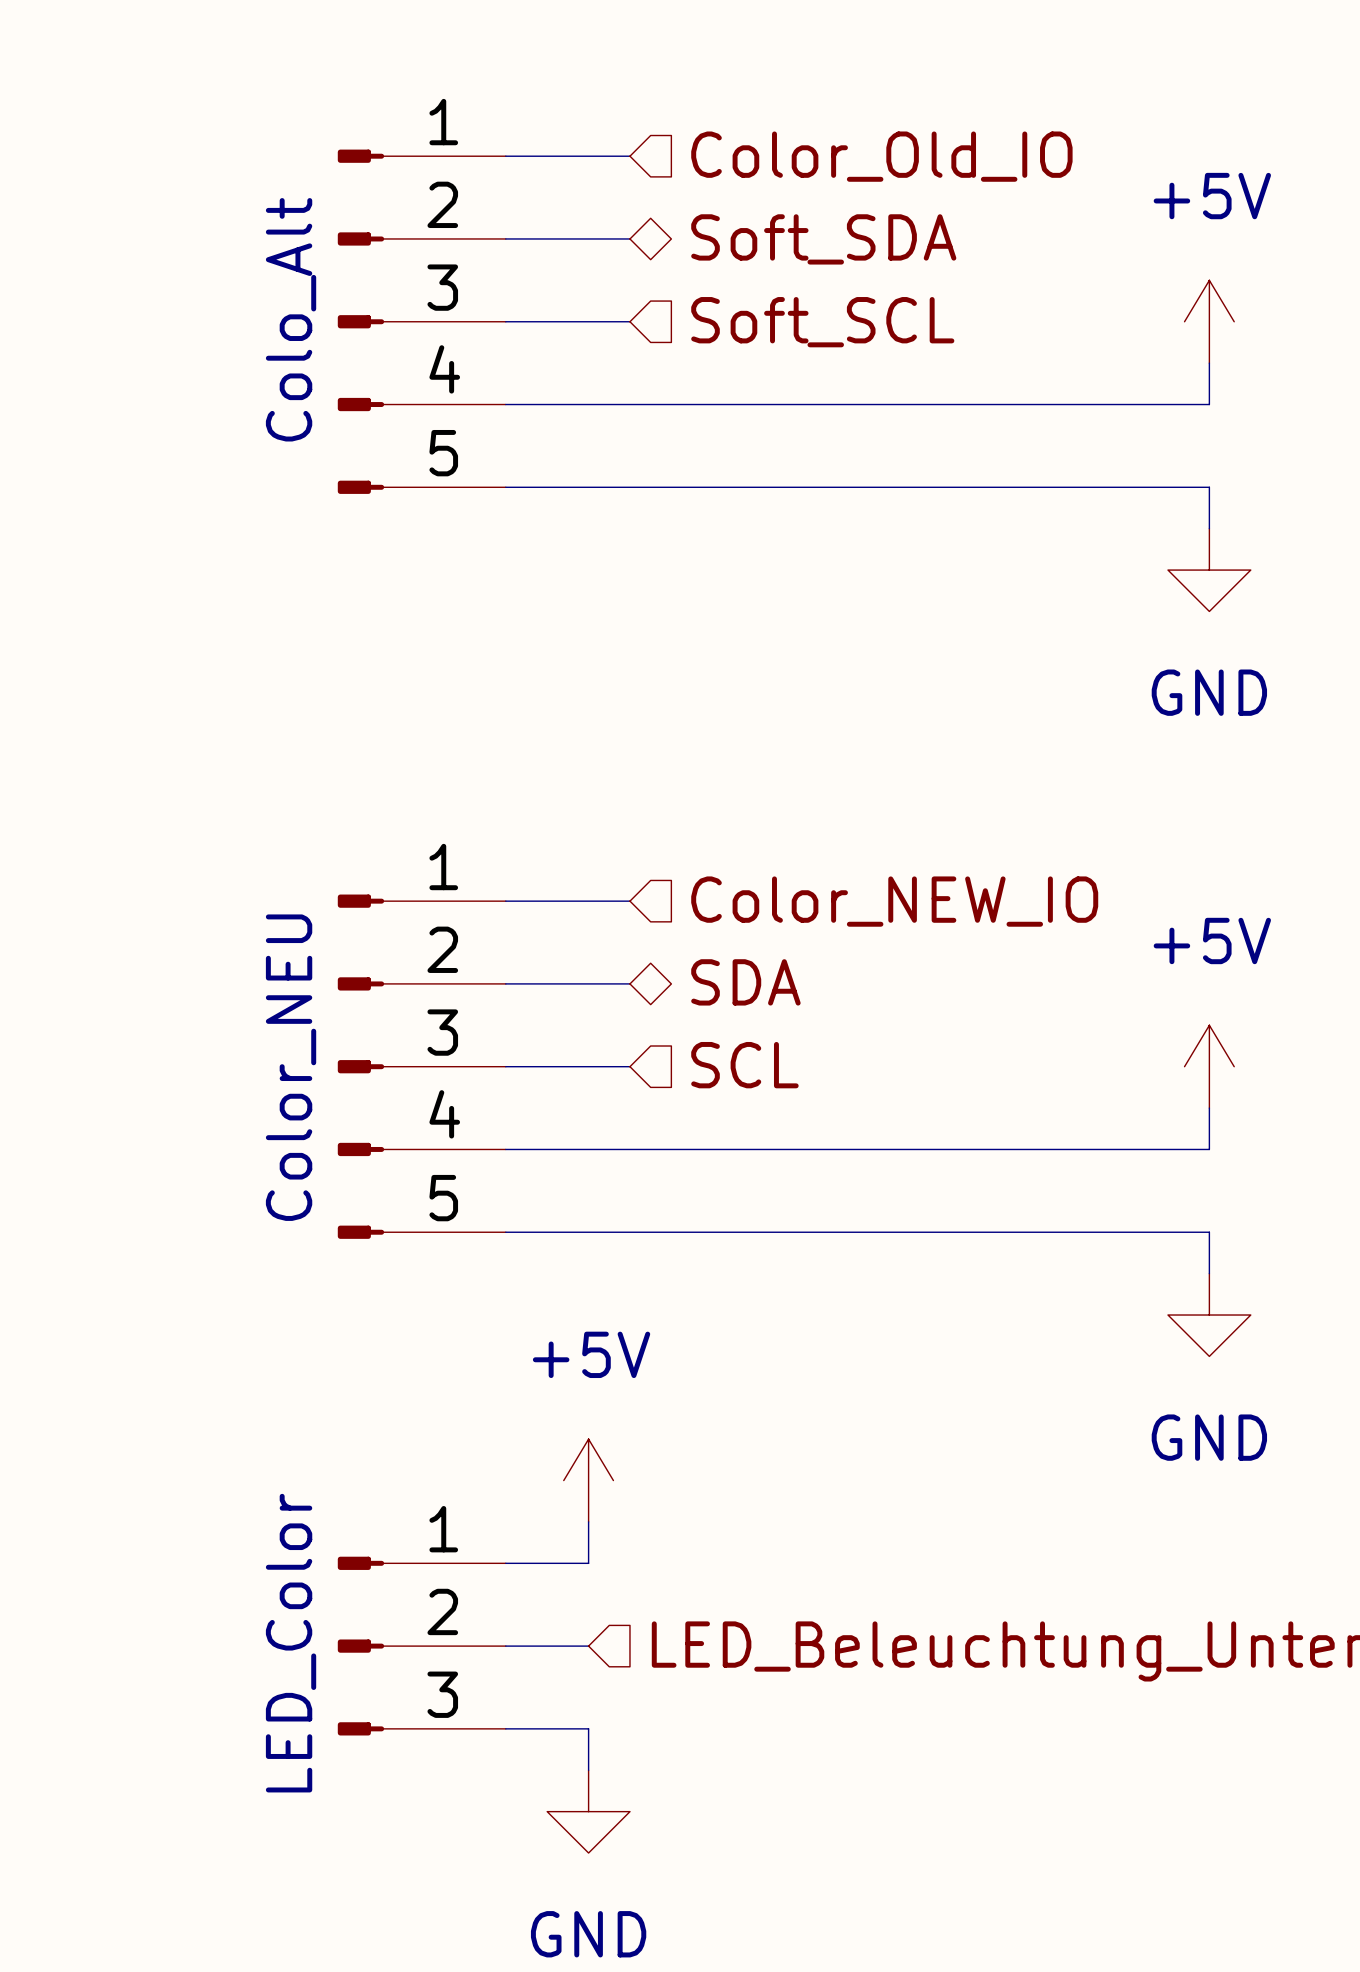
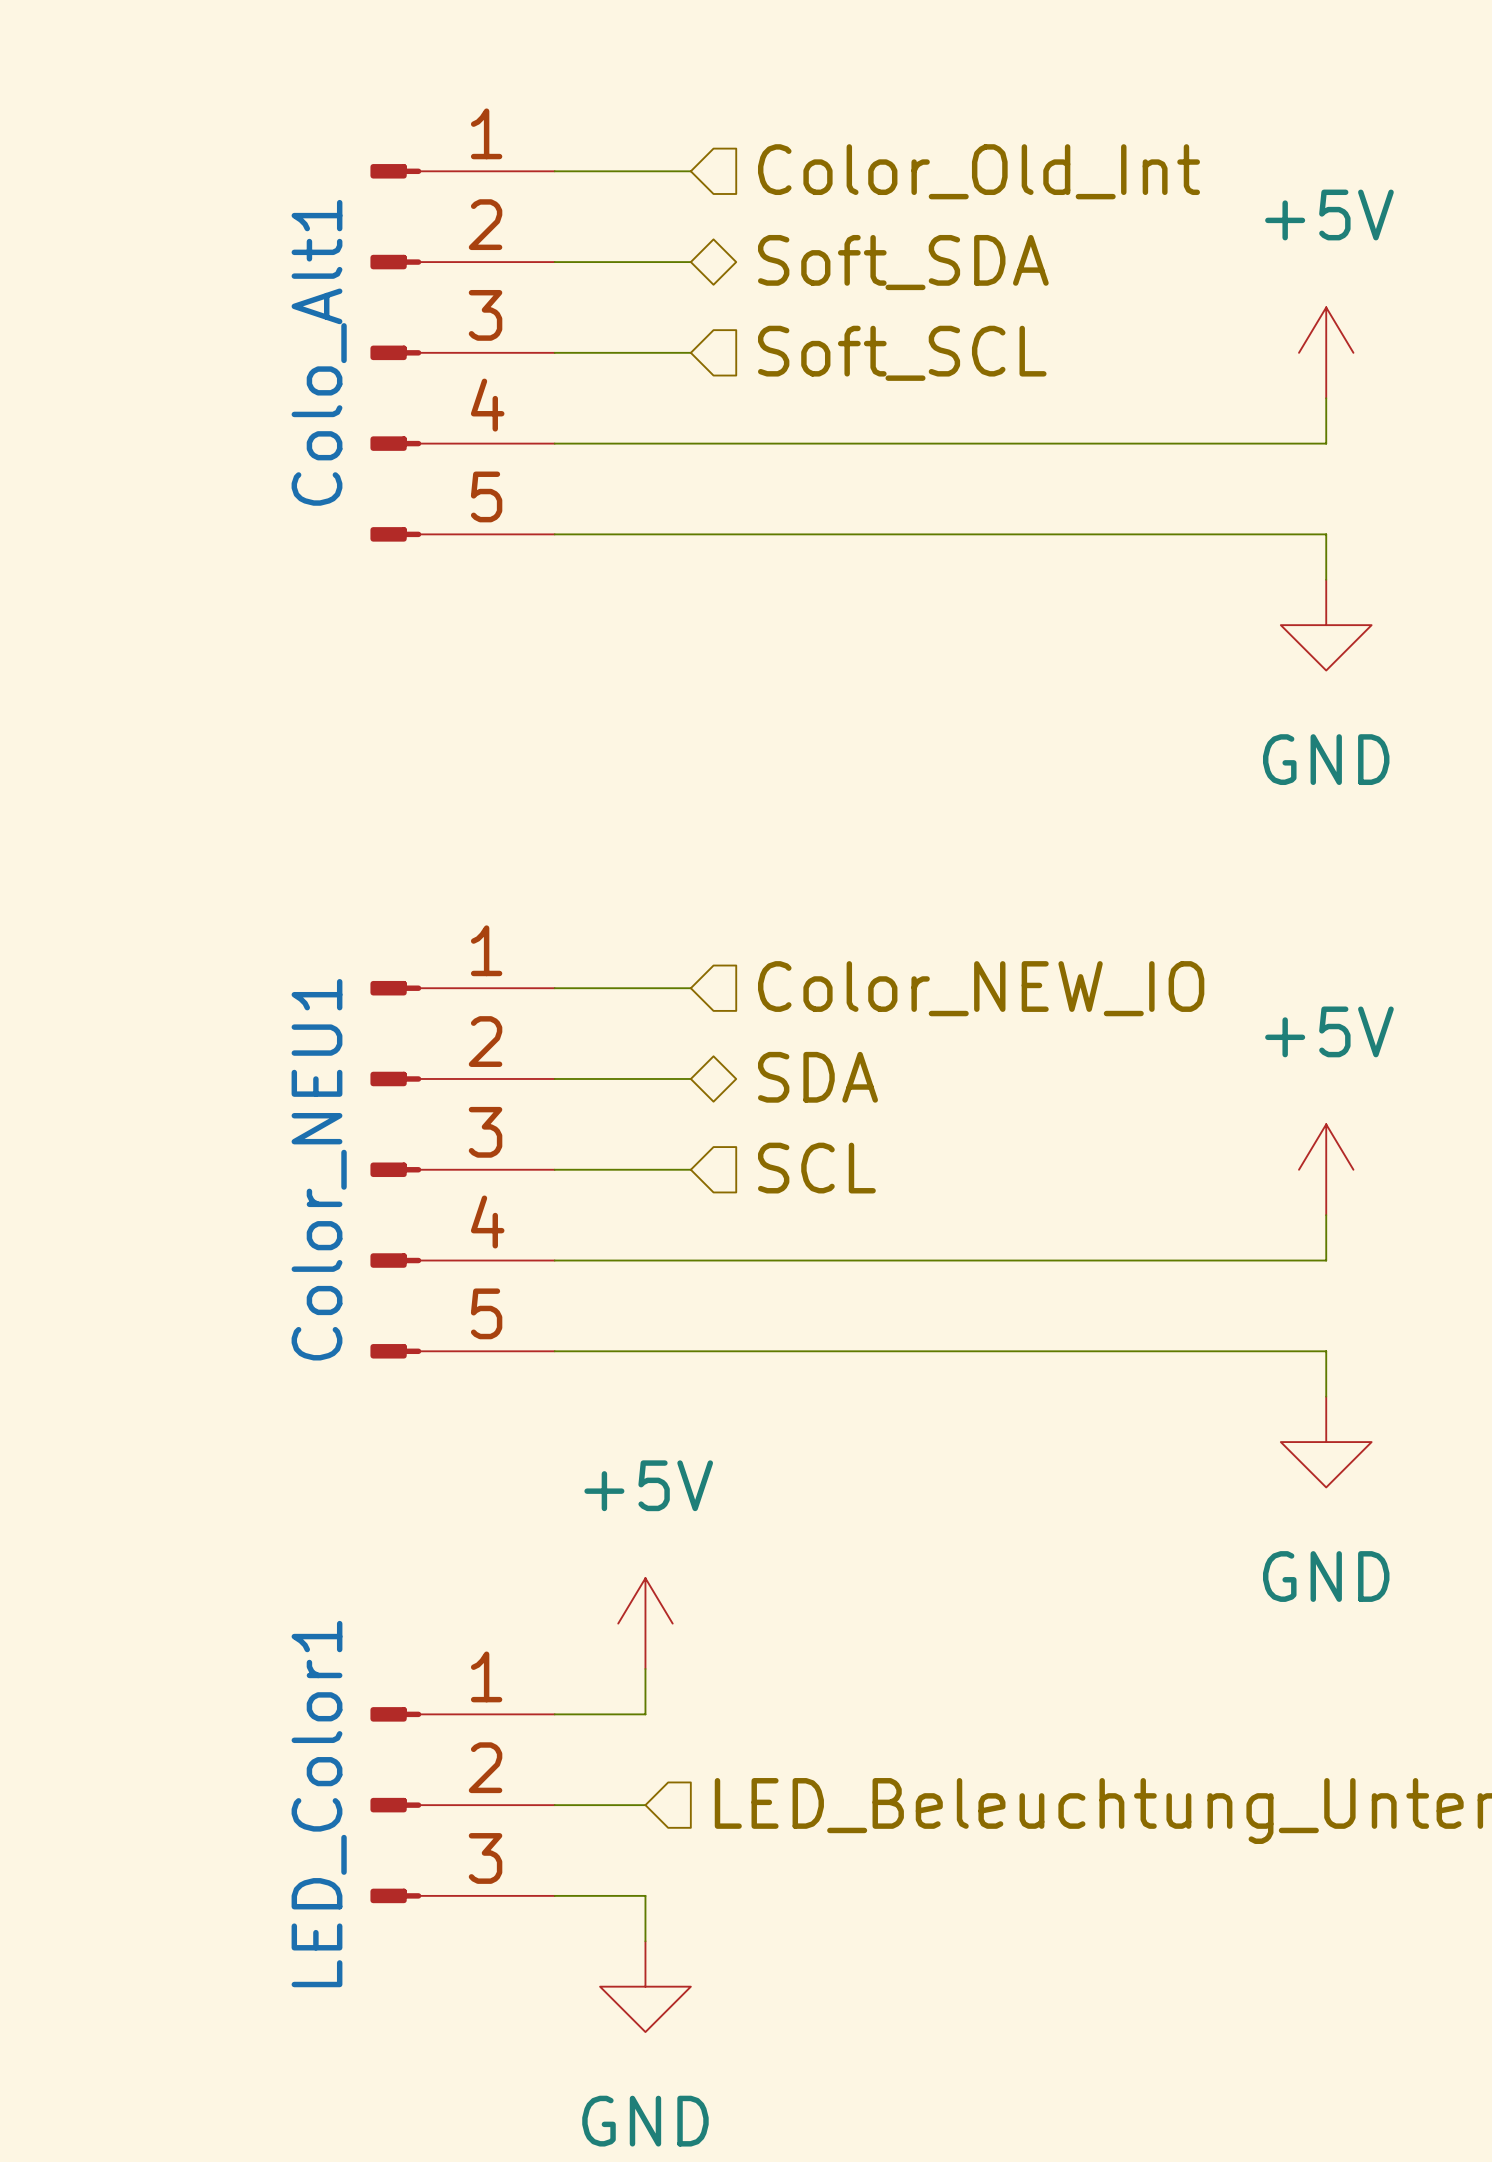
hierarchical label: Color_Old_IO (881, 156) -> Color_Old_Int (978, 171)
Colo_Alt name: Colo_Alt (291, 319) -> Colo_Alt1 (319, 352)
Color_NEU name: Color_NEU (291, 1067) -> Color_NEU1 (319, 1169)
LED_Color name: LED_Color (291, 1643) -> LED_Color1 (319, 1804)

